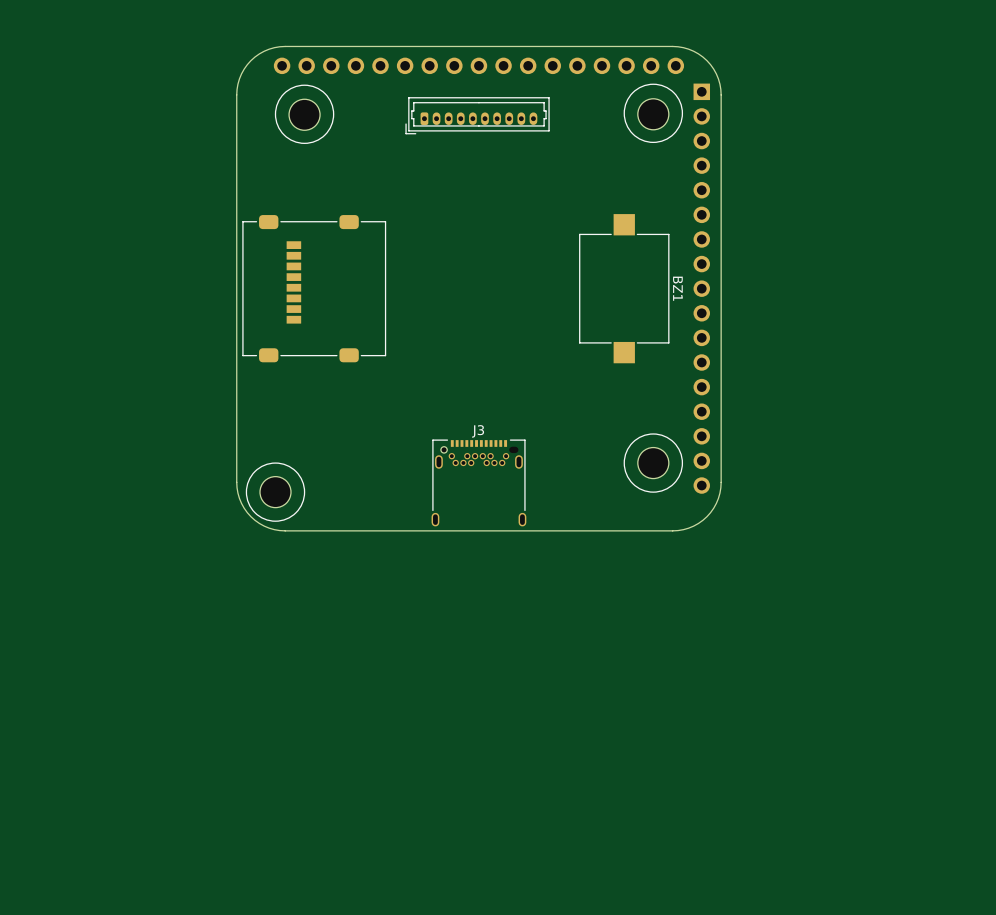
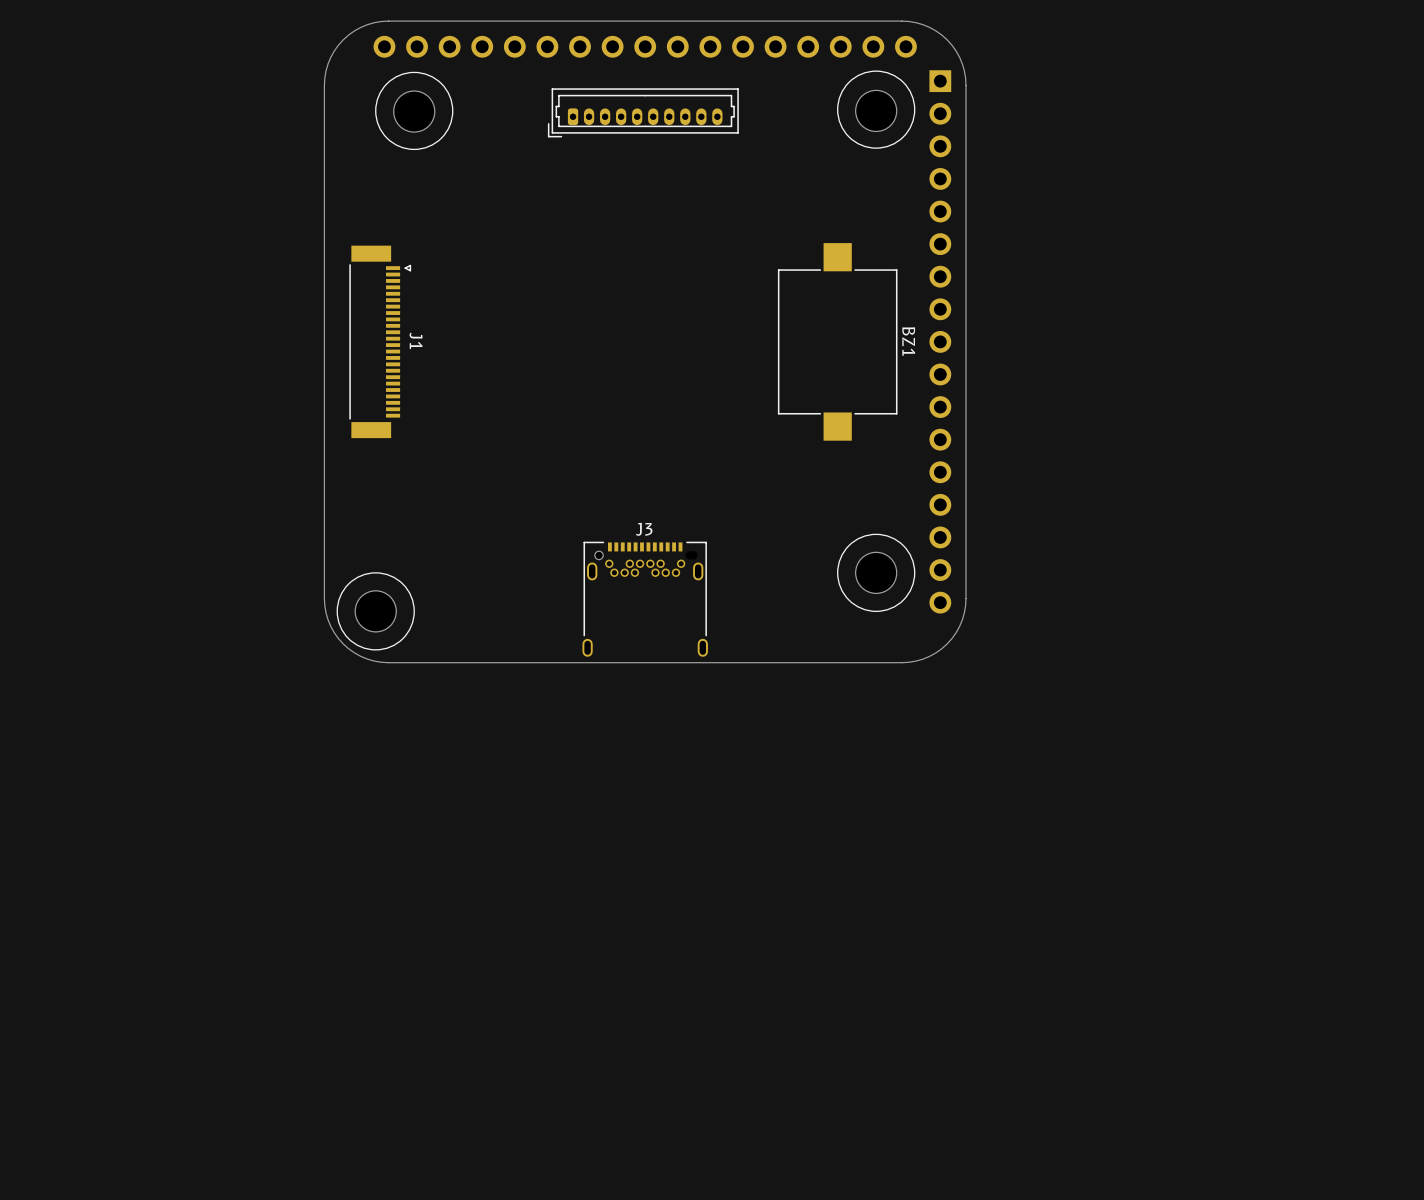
J1: none -> (380, 341)
part: (314, 288) -> none

